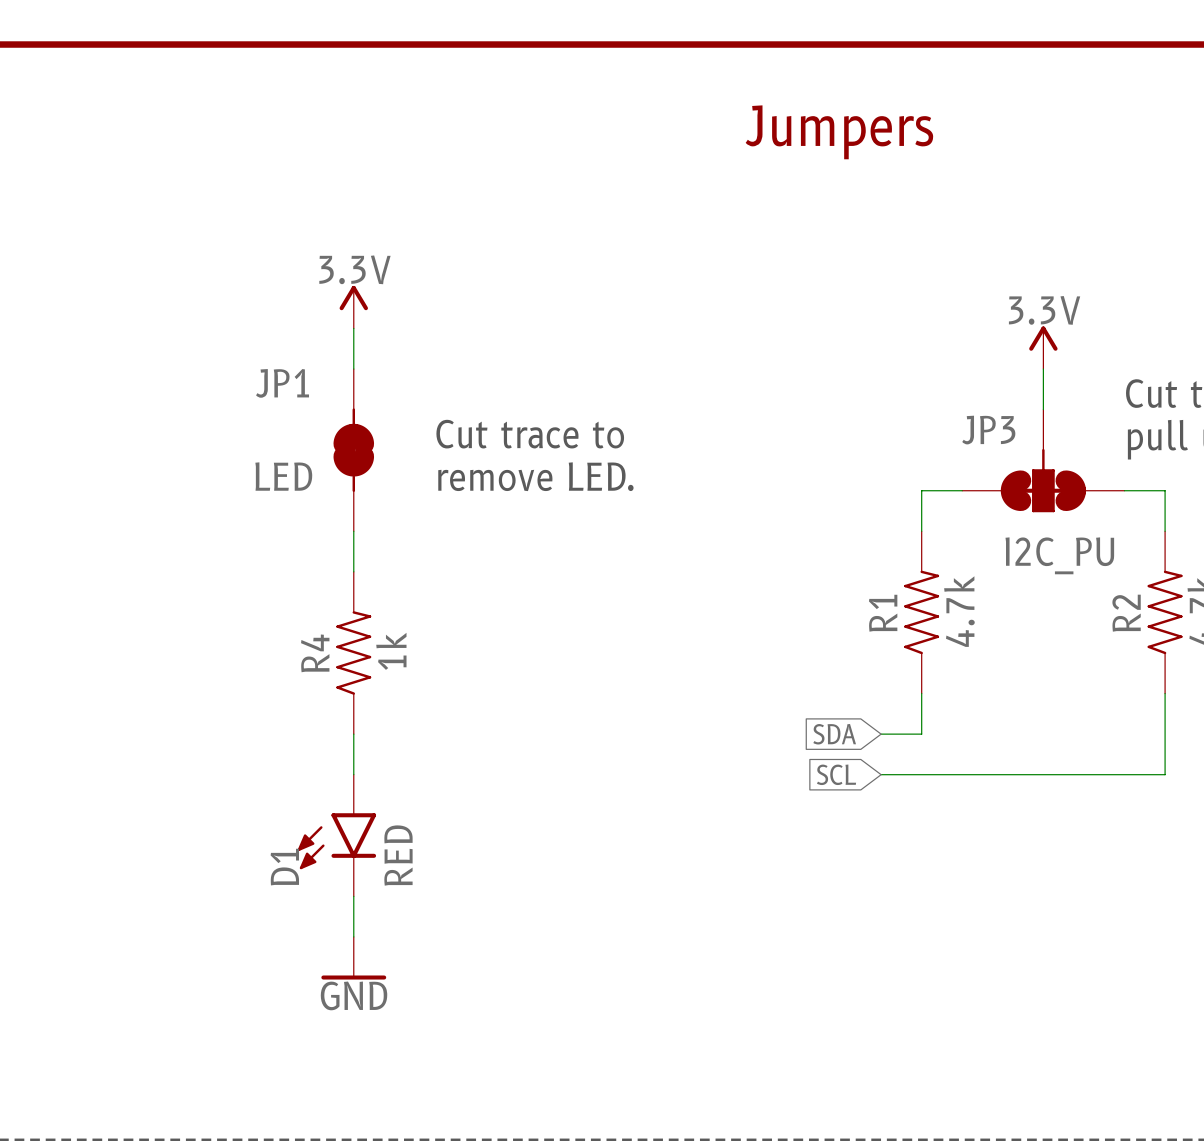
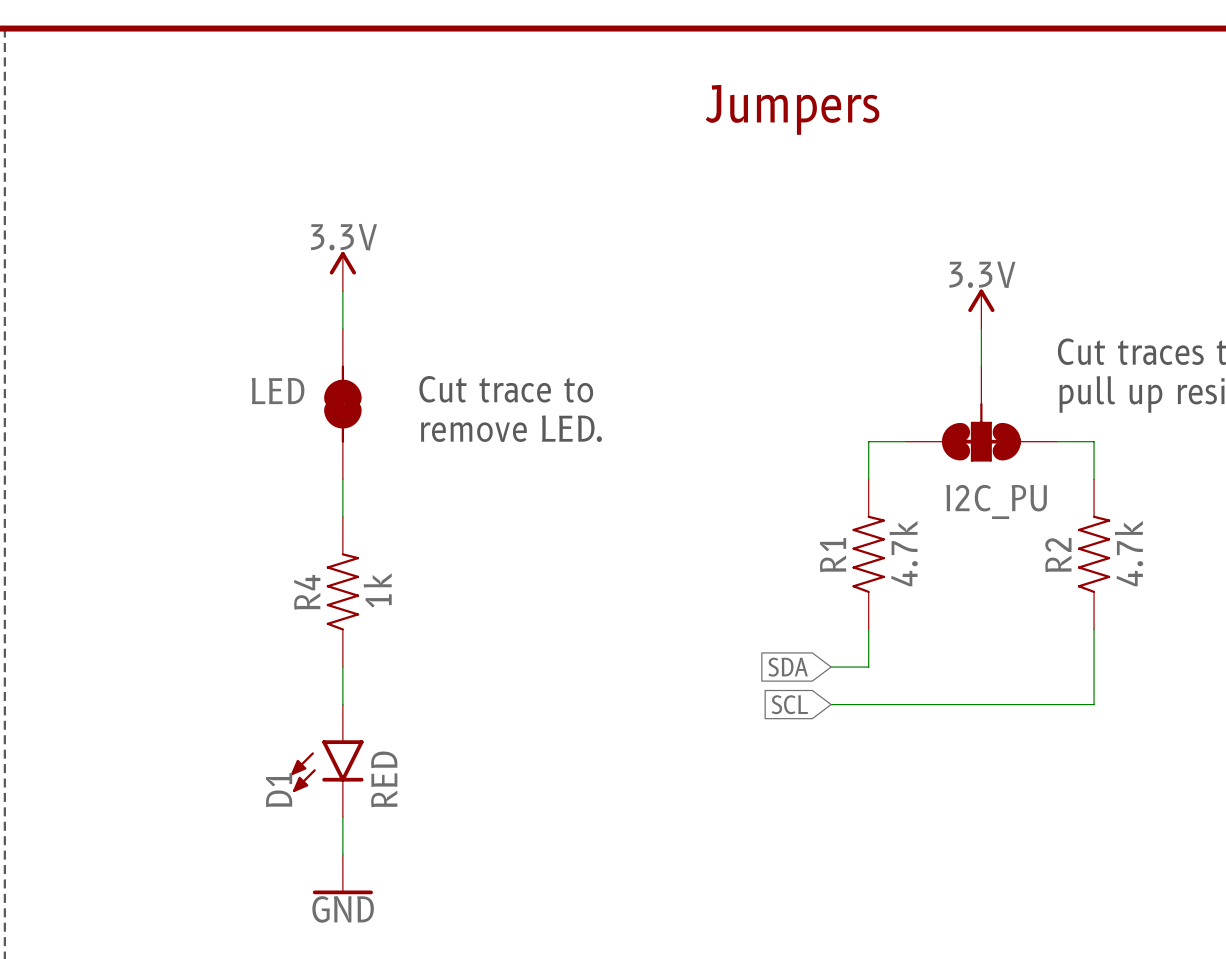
JP1 name: JP1 (282, 383) -> none
JP3 name: JP3 (988, 430) -> none
JP1 value position: LED (283, 476) -> LED (278, 390)

